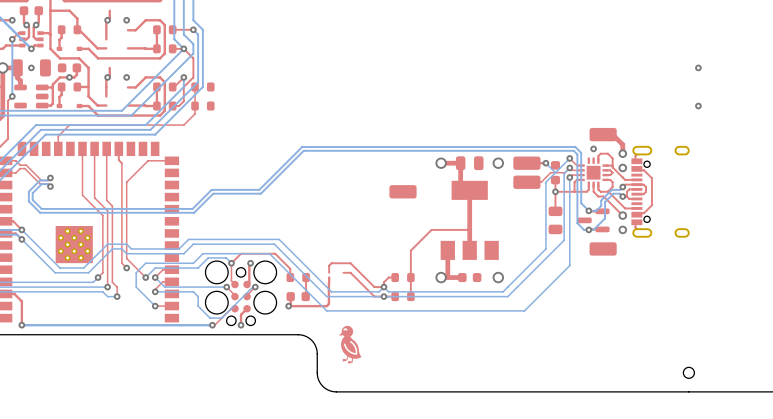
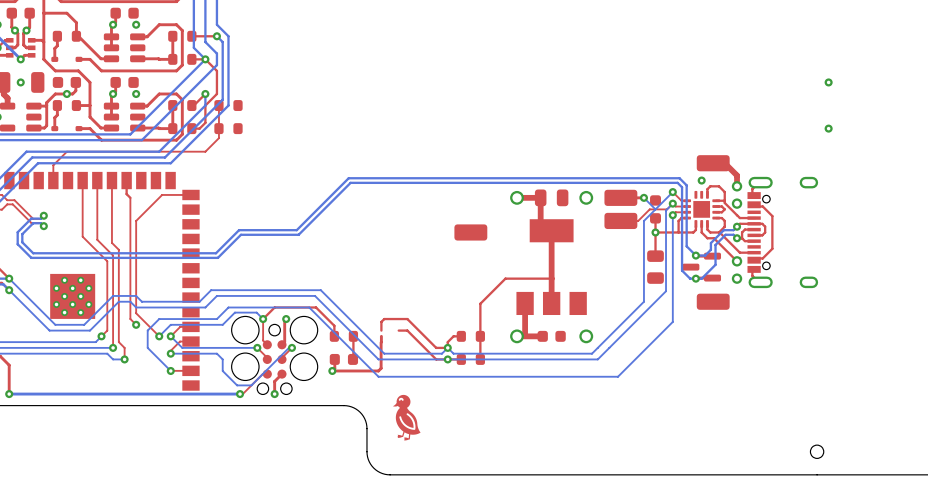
part: none -> (124, 13)
part: none -> (124, 47)
part: none -> (124, 82)
part: none -> (124, 117)

